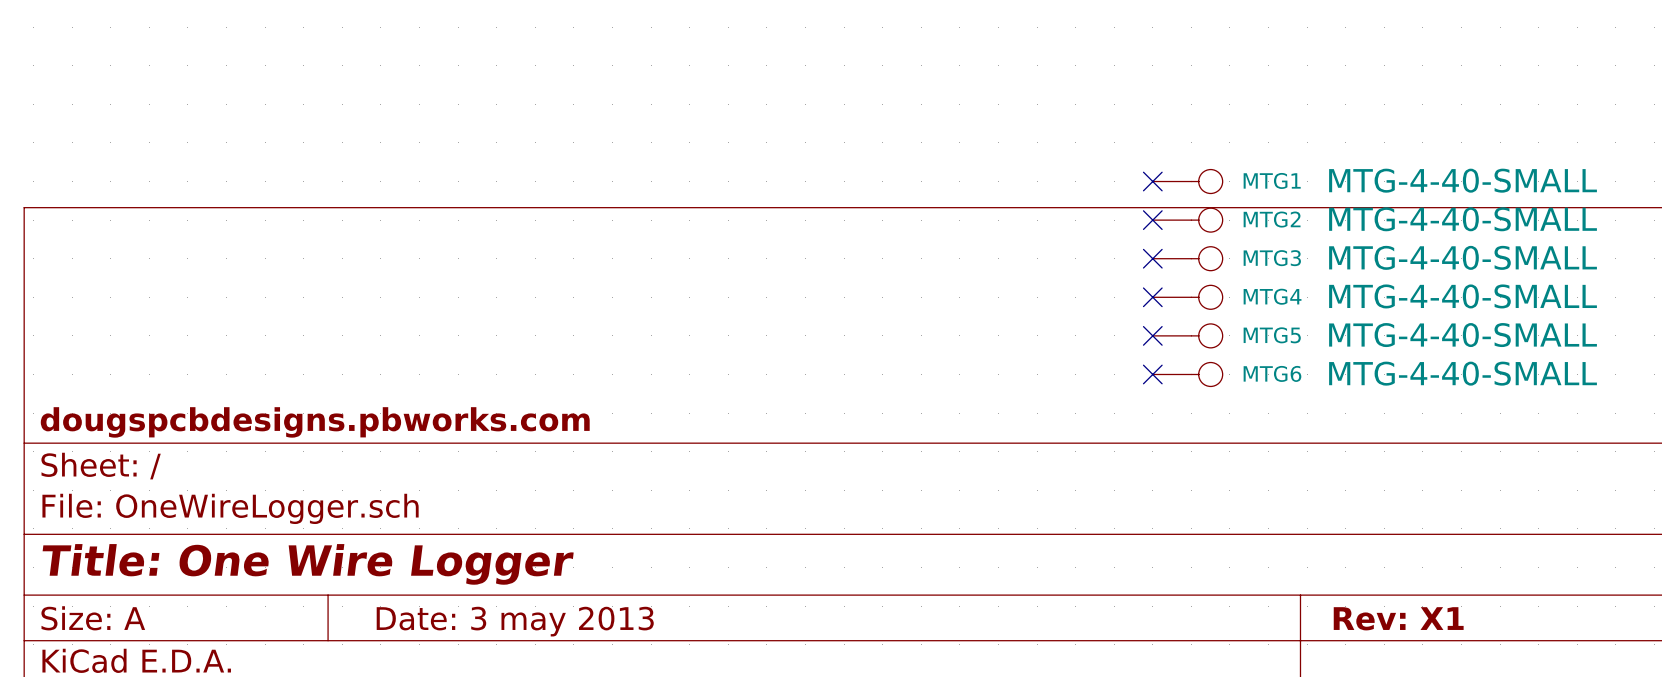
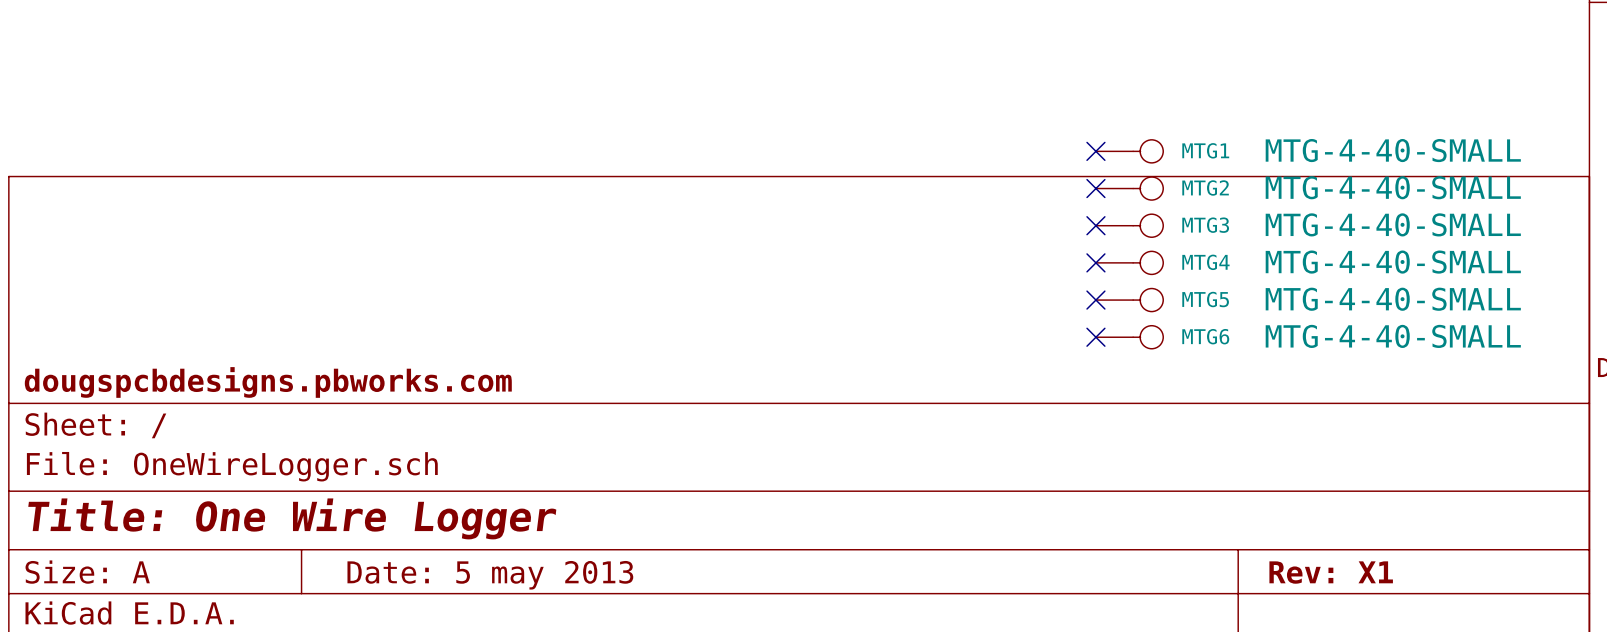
title block: Date: 3 may 2013 (515, 621) -> Date: 5 may 2013 (490, 575)

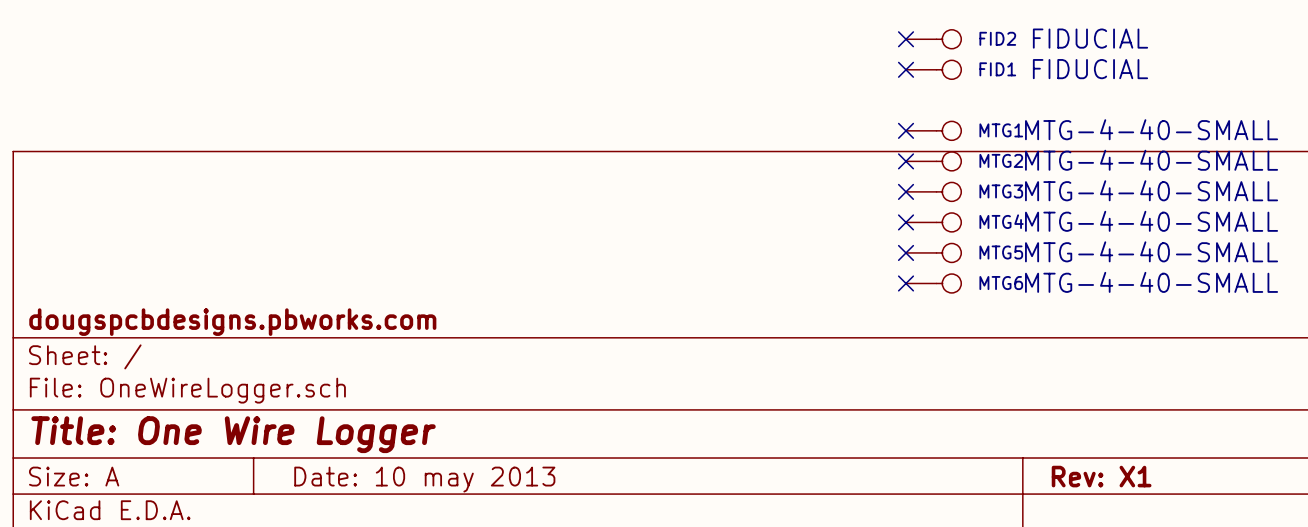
no-connect mark: none -> (906, 39)
FID2: none -> (933, 39)
no-connect mark: none -> (906, 69)
FID1: none -> (933, 69)
title block: Date: 5 may 2013 (490, 575) -> Date: 10 may 2013 (424, 479)

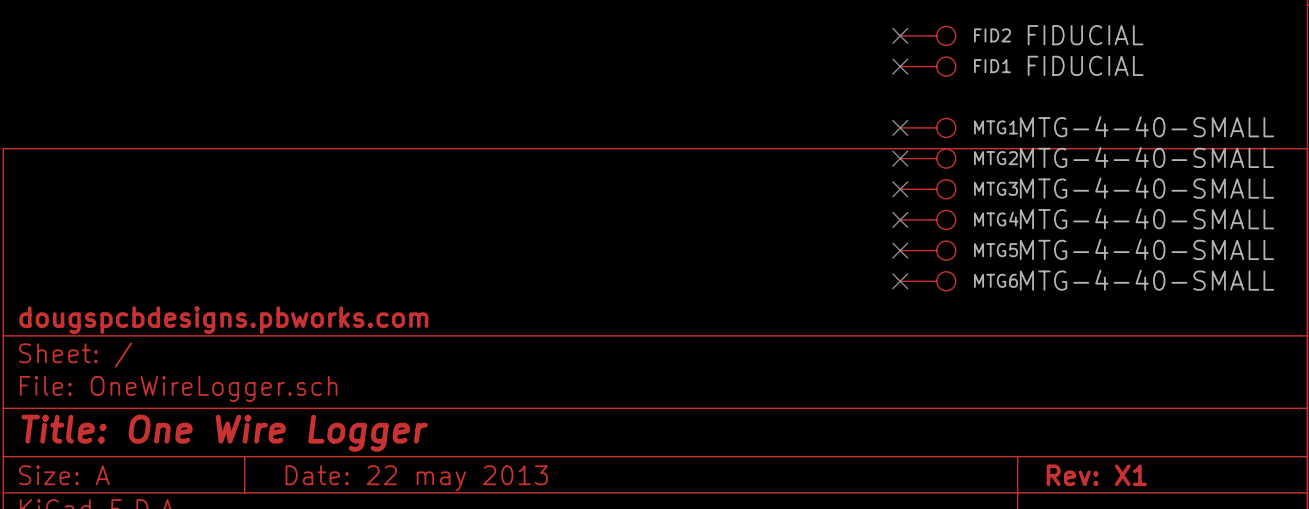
title block: Date: 10 may 2013 (424, 479) -> Date: 22 may 2013 (416, 478)

